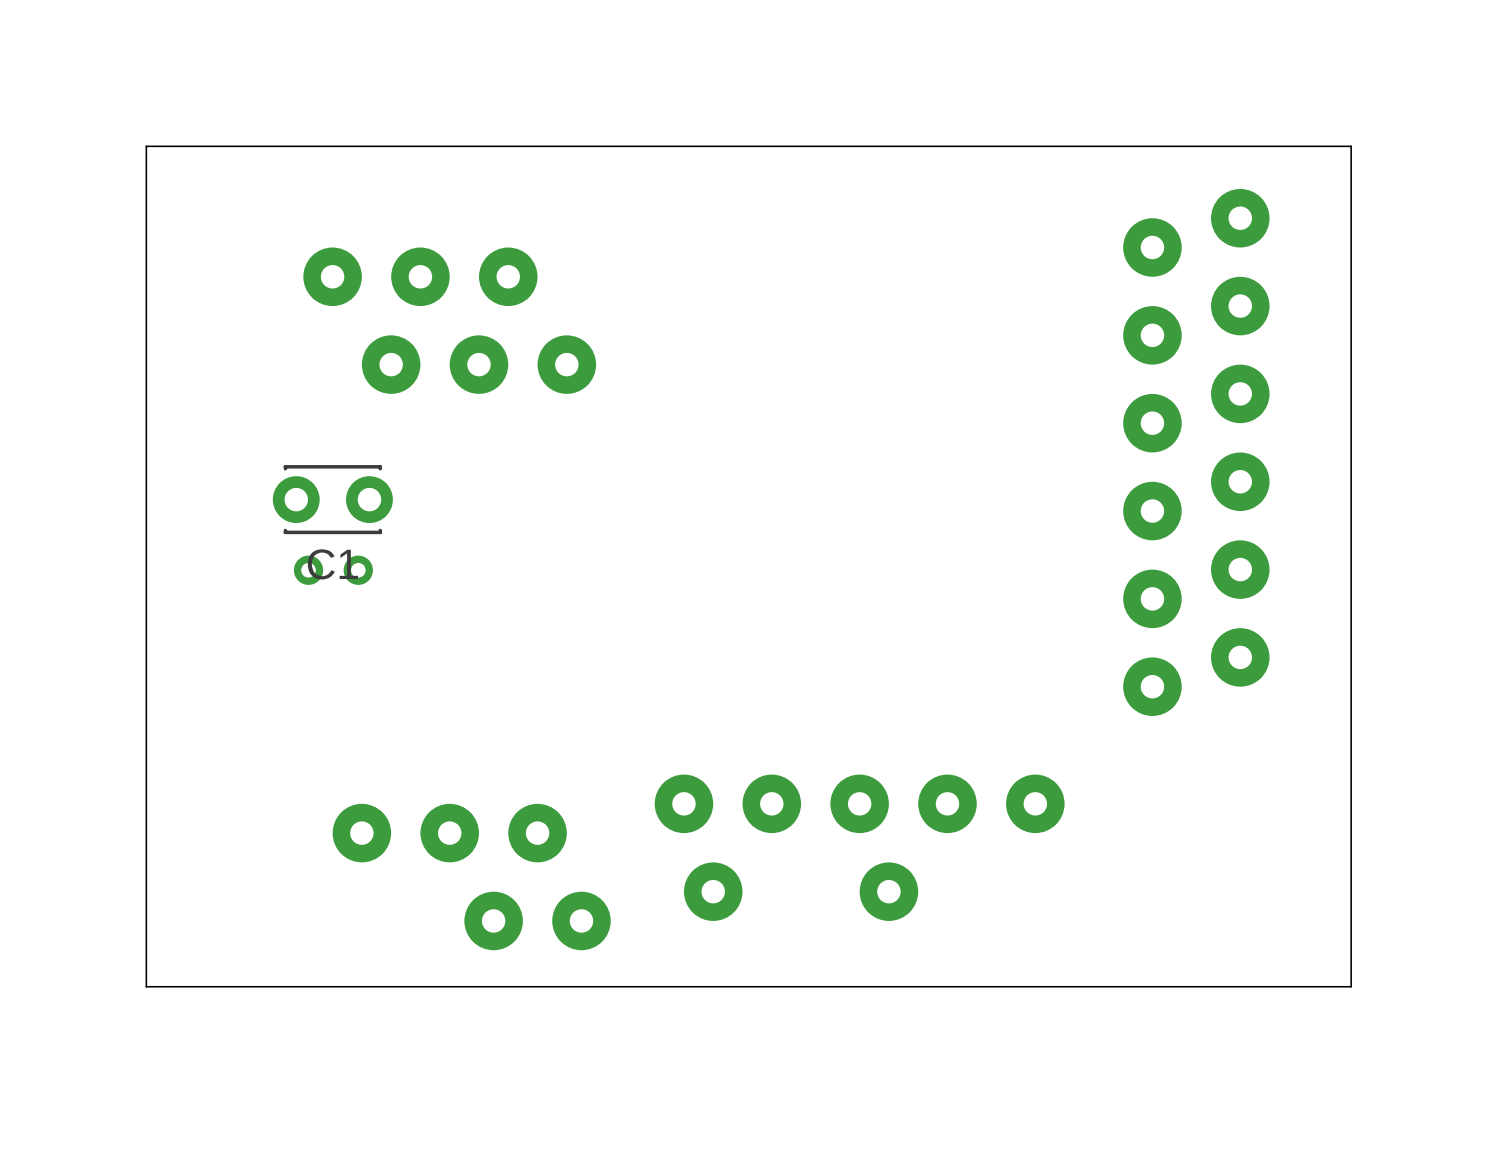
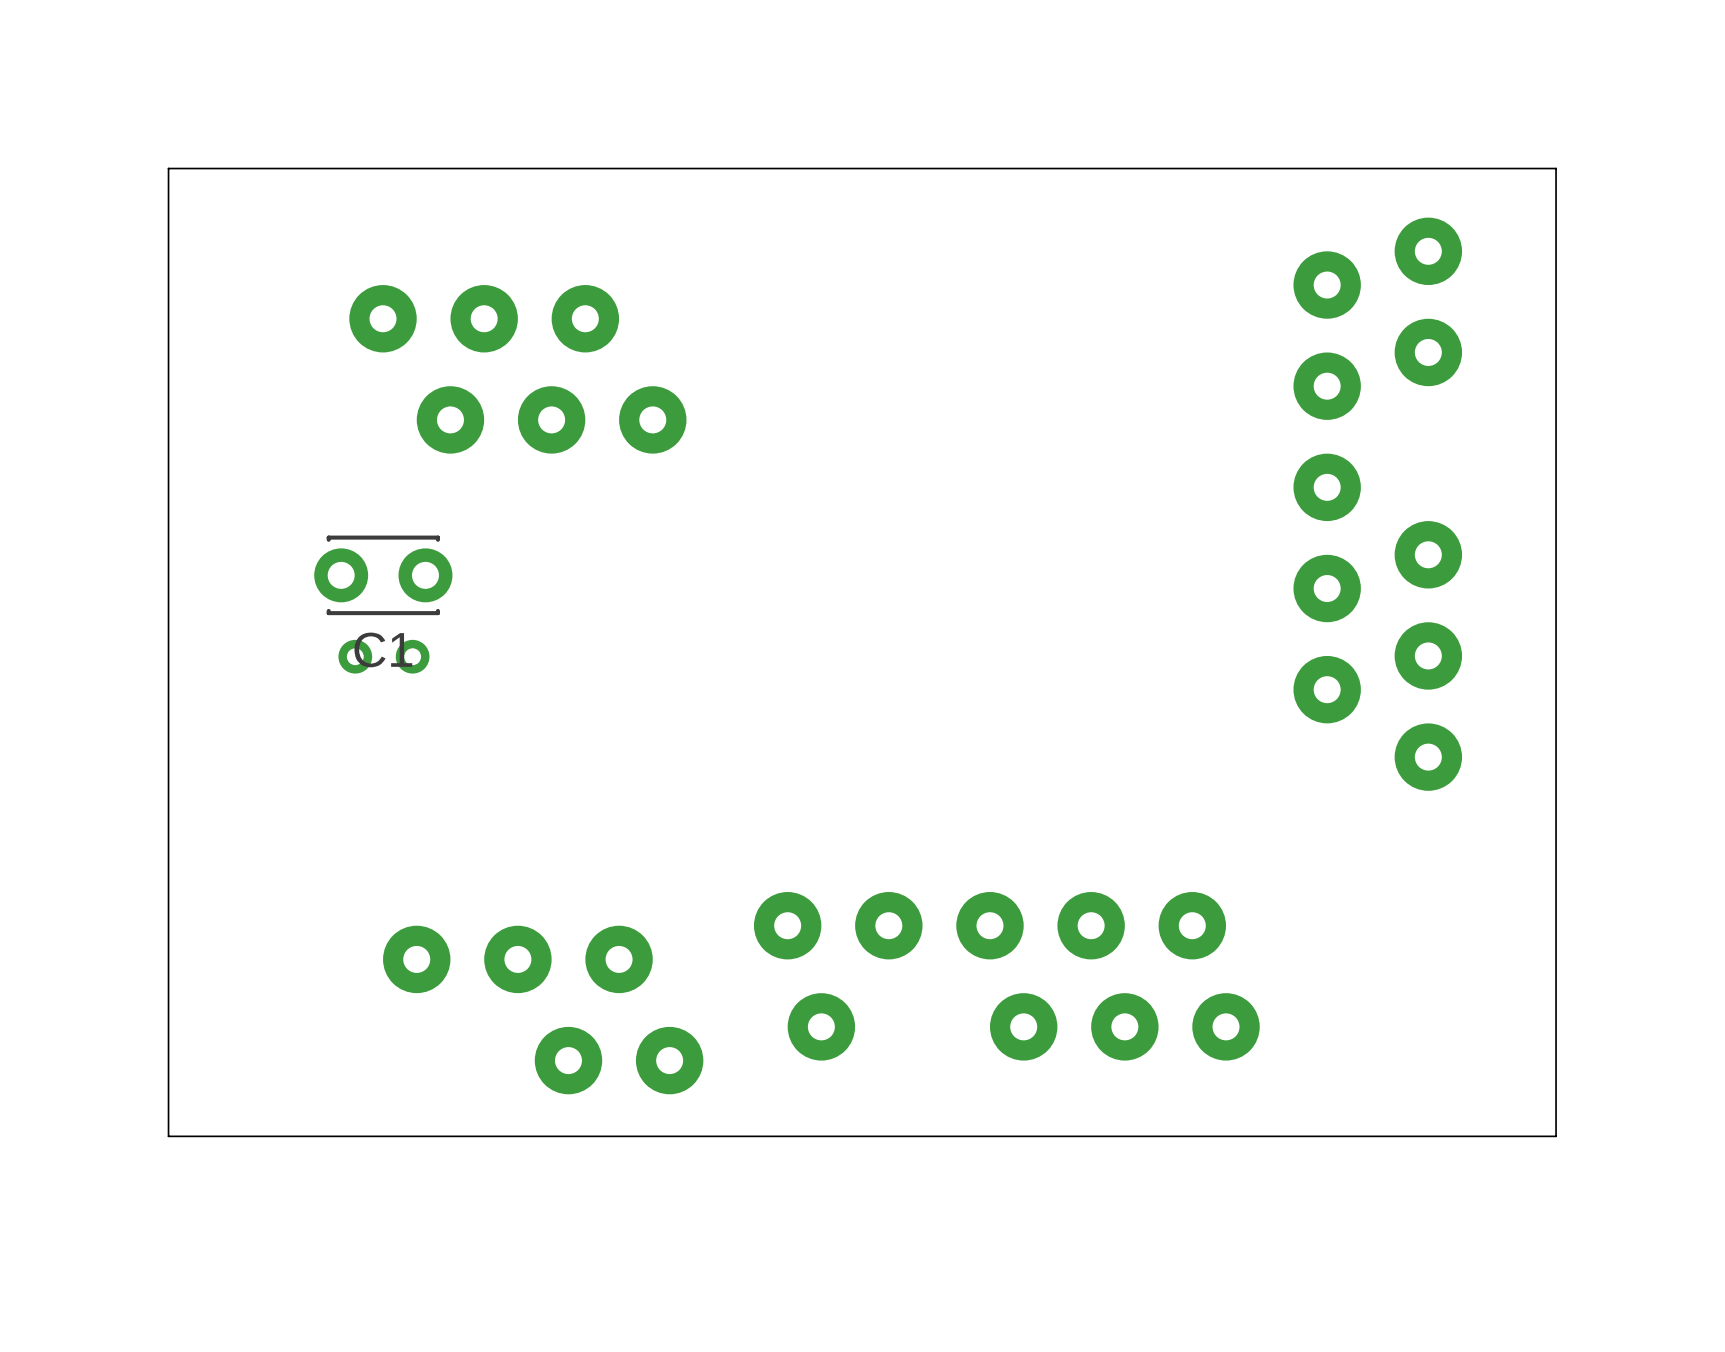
part: (1240, 393) -> none
part: (1152, 686) -> none
part: none -> (1124, 1026)
part: none -> (1226, 1026)

